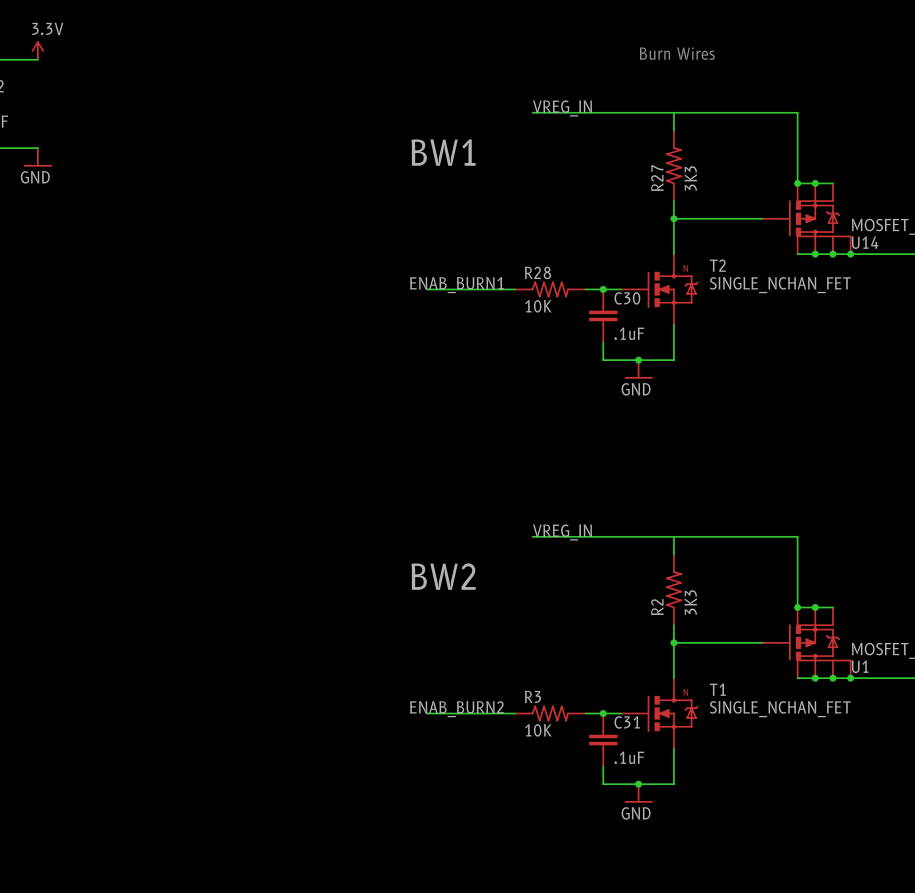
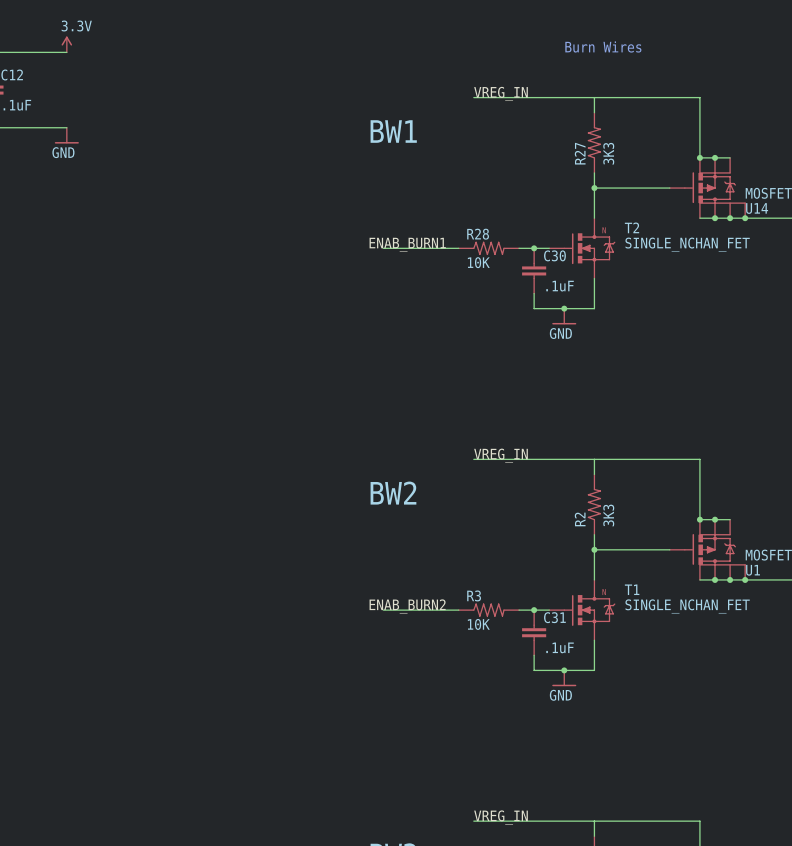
power symbol position: 3.3V (37, 50) -> 3.3V (66, 44)
wire: none -> (51, 52) (66, 52)
wire: none -> (51, 127) (66, 127)
power symbol position: GND (37, 157) -> GND (66, 135)

